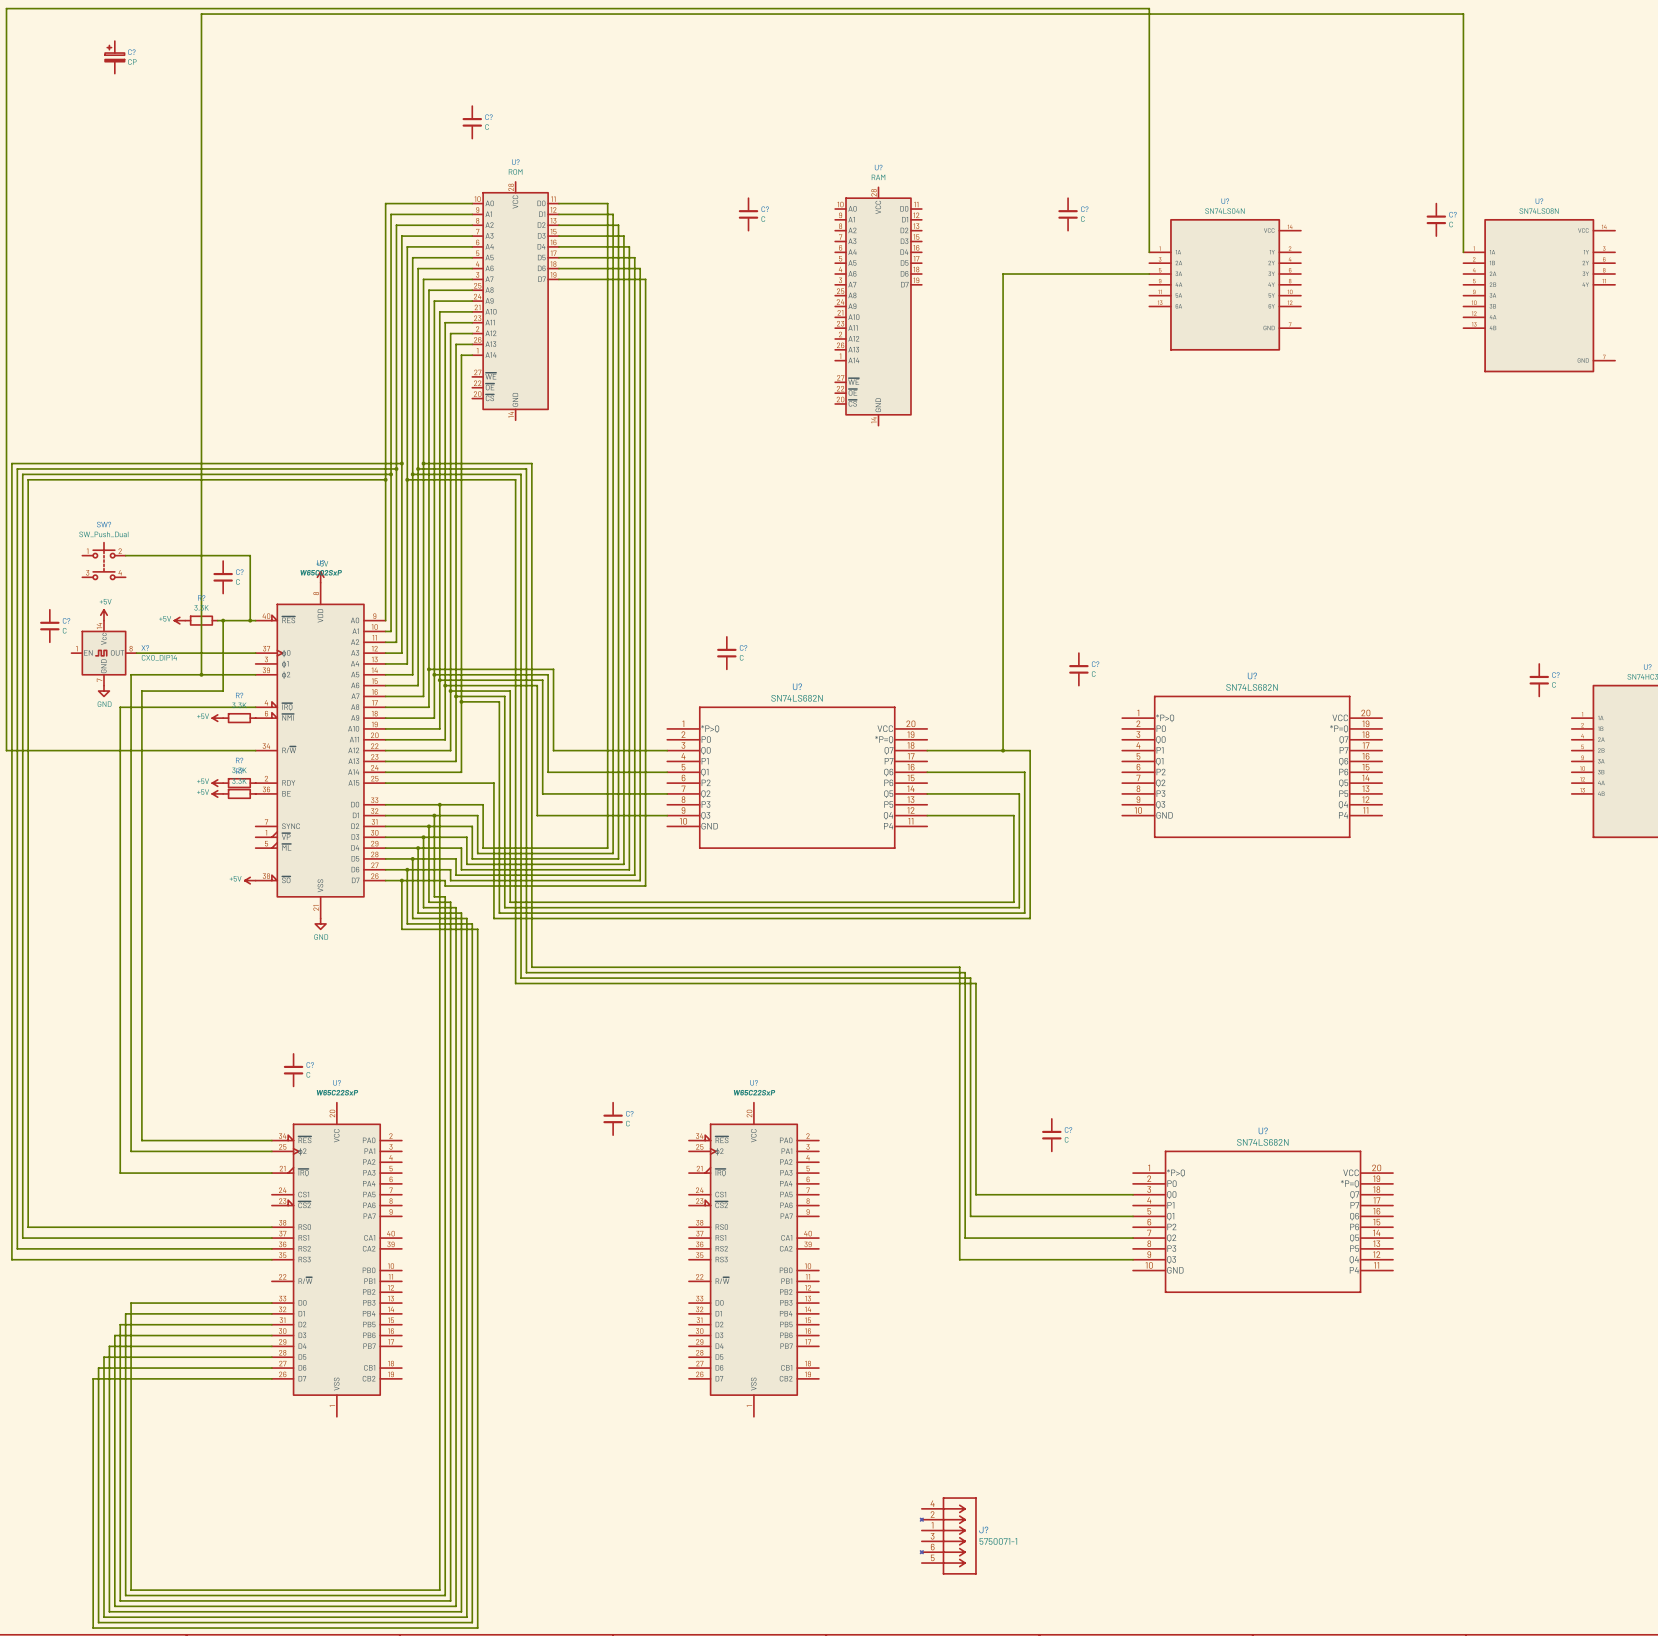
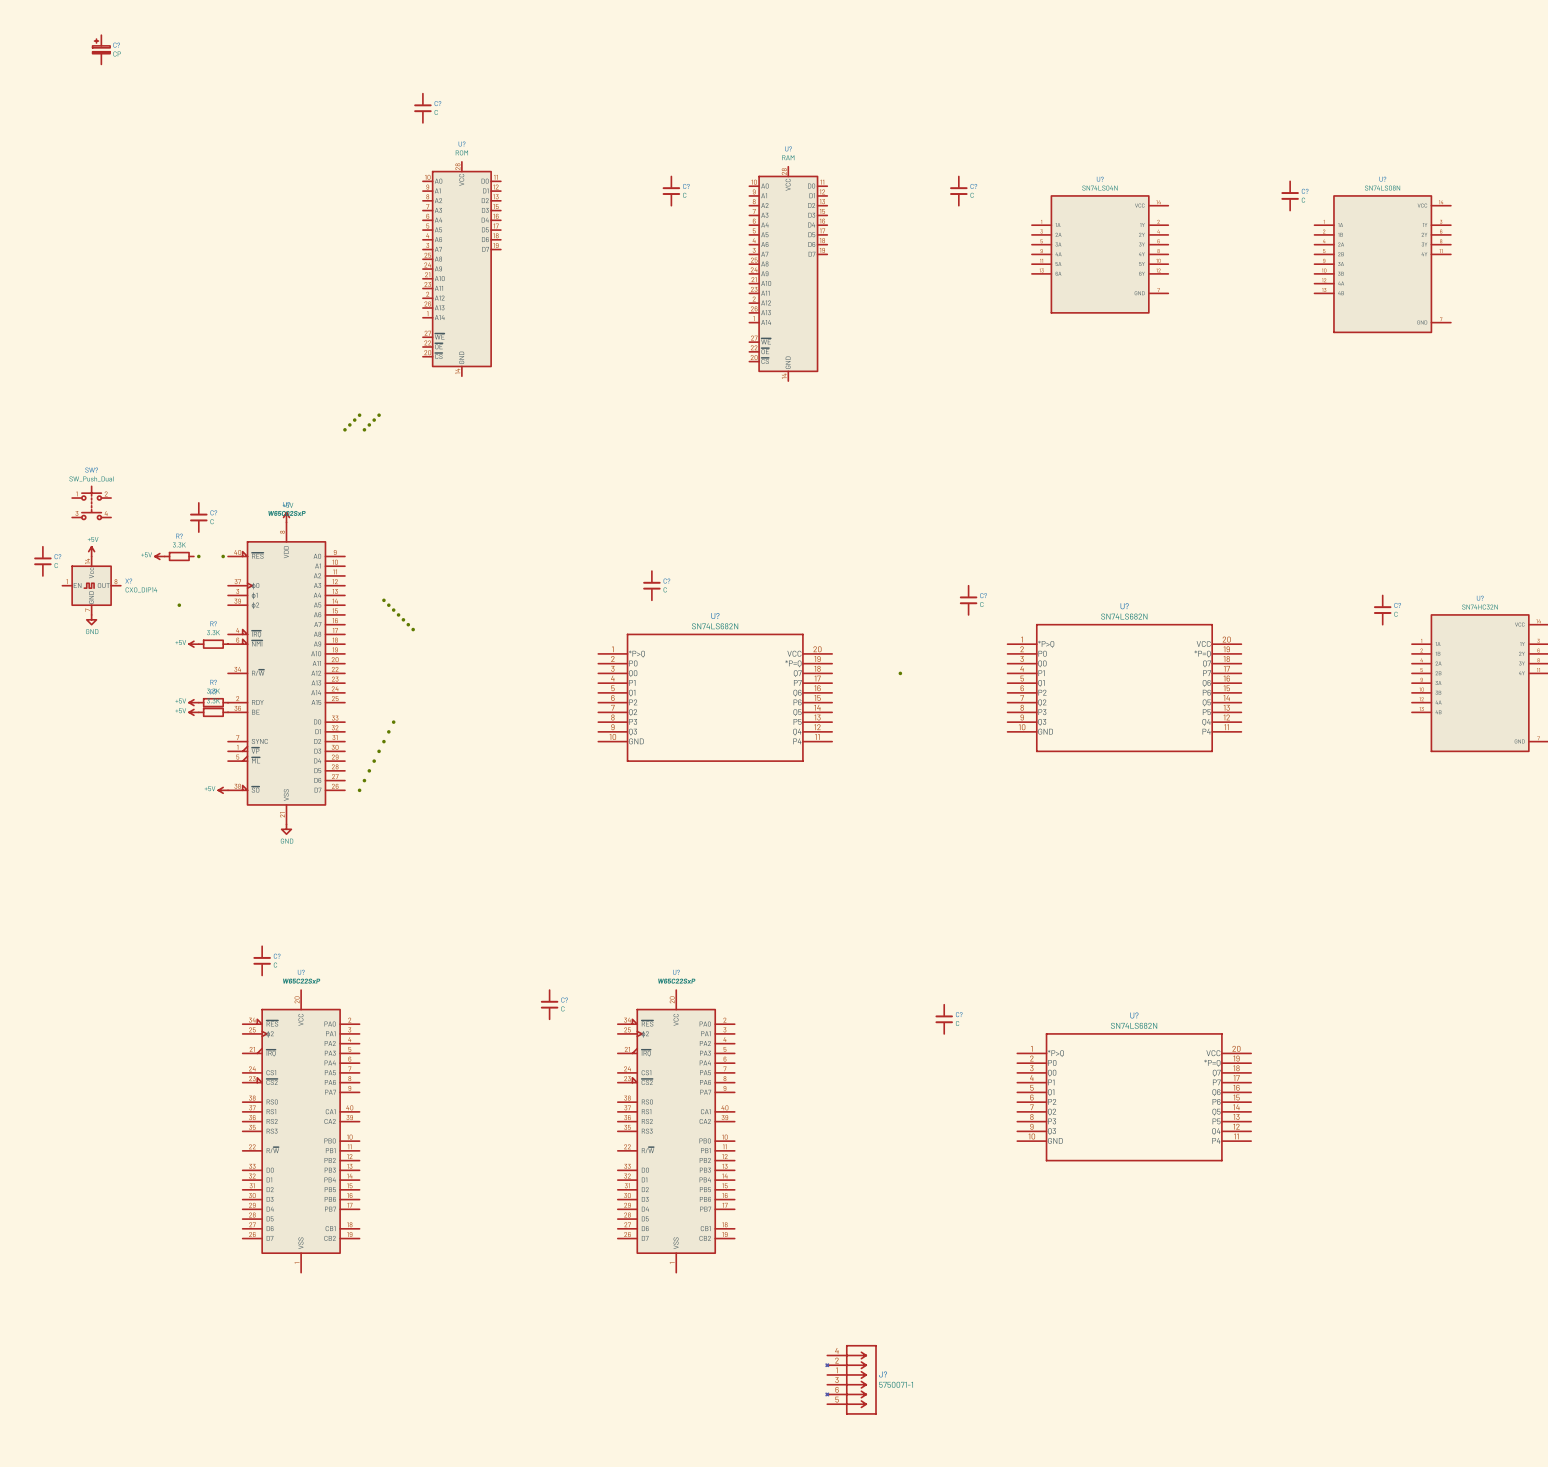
wire: (472, 203) (385, 203) (385, 620) -> none
wire: (558, 203) (607, 203) (607, 848) (483, 848) (483, 804) (385, 804) -> none
wire: (472, 214) (391, 214) (391, 631) (385, 631) -> none
wire: (558, 214) (613, 214) (613, 853) (477, 853) (477, 815) (385, 815) -> none
wire: (472, 225) (396, 225) (396, 642) (385, 642) -> none
wire: (558, 225) (618, 225) (618, 858) (472, 858) (472, 826) (385, 826) -> none
wire: (472, 236) (401, 236) (401, 653) (385, 653) -> none
wire: (558, 236) (623, 236) (623, 864) (466, 864) (466, 837) (385, 837) -> none
wire: (472, 246) (407, 246) (407, 663) (385, 663) -> none
wire: (558, 246) (629, 246) (629, 869) (461, 869) (461, 848) (385, 848) -> none
wire: (1149, 252) (1149, 8) (6, 8) (6, 750) (255, 750) -> none
wire: (1463, 252) (1463, 14) (201, 14) (201, 674) -> none
wire: (472, 257) (412, 257) (412, 674) (385, 674) -> none
wire: (558, 257) (634, 257) (634, 875) (456, 875) (456, 858) (385, 858) -> none
wire: (472, 268) (418, 268) (418, 685) (385, 685) -> none
wire: (558, 268) (640, 268) (640, 880) (450, 880) (450, 869) (385, 869) -> none
wire: (1149, 274) (1003, 274) (1003, 750) -> none
wire: (472, 279) (423, 279) (423, 696) (385, 696) -> none
wire: (558, 279) (645, 279) (645, 886) (445, 886) (445, 880) (385, 880) -> none
wire: (472, 290) (428, 290) (428, 707) (385, 707) -> none
wire: (472, 301) (434, 301) (434, 718) (385, 718) -> none
wire: (472, 311) (439, 311) (439, 728) (385, 728) -> none
wire: (472, 322) (445, 322) (445, 739) (385, 739) -> none
wire: (472, 333) (450, 333) (450, 750) (385, 750) -> none
wire: (472, 344) (456, 344) (456, 761) (385, 761) -> none
wire: (472, 355) (461, 355) (461, 772) (385, 772) -> none
wire: (401, 463) (11, 463) (11, 1259) (271, 1259) -> none
wire: (423, 463) (531, 463) (531, 967) (959, 967) (959, 1259) (1133, 1259) -> none
wire: (396, 468) (17, 468) (17, 1248) (271, 1248) -> none
wire: (418, 468) (526, 468) (526, 972) (965, 972) (965, 1238) (1133, 1238) -> none
wire: (391, 474) (22, 474) (22, 1238) (271, 1238) -> none
wire: (412, 474) (521, 474) (521, 978) (970, 978) (970, 1216) (1133, 1216) -> none
wire: (385, 479) (28, 479) (28, 1227) (271, 1227) -> none
wire: (407, 479) (515, 479) (515, 983) (975, 983) (975, 1194) (1133, 1194) -> none
wire: (125, 555) (250, 555) (250, 620) -> none
wire: (217, 620) (255, 620) -> none
wire: (223, 620) (223, 691) (141, 691) (141, 1140) (271, 1140) -> none
wire: (136, 653) (255, 653) -> none
wire: (428, 669) (553, 669) (553, 750) (667, 750) -> none
wire: (255, 674) (131, 674) (131, 1151) (271, 1151) -> none
wire: (434, 674) (548, 674) (548, 772) (667, 772) -> none
wire: (439, 680) (542, 680) (542, 793) (667, 793) -> none
wire: (445, 685) (537, 685) (537, 815) (667, 815) -> none
wire: (450, 691) (510, 691) (510, 902) (1013, 902) (1013, 815) (927, 815) -> none
wire: (456, 696) (504, 696) (504, 907) (1019, 907) (1019, 793) (927, 793) -> none
wire: (461, 701) (499, 701) (499, 913) (1024, 913) (1024, 772) (927, 772) -> none
wire: (255, 707) (120, 707) (120, 1173) (271, 1173) -> none
wire: (927, 750) (1030, 750) (1030, 918) (493, 918) (493, 783) (385, 783) -> none
wire: (439, 804) (439, 1590) (131, 1590) (131, 1303) (271, 1303) -> none
wire: (434, 815) (434, 896) (445, 896) (445, 1595) (125, 1595) (125, 1313) (271, 1313) -> none
wire: (428, 826) (428, 902) (450, 902) (450, 1600) (120, 1600) (120, 1324) (271, 1324) -> none
wire: (423, 837) (423, 907) (456, 907) (456, 1606) (114, 1606) (114, 1335) (271, 1335) -> none
wire: (418, 848) (418, 913) (461, 913) (461, 1611) (109, 1611) (109, 1346) (271, 1346) -> none
wire: (412, 858) (412, 918) (466, 918) (466, 1617) (103, 1617) (103, 1357) (271, 1357) -> none
wire: (407, 869) (407, 923) (472, 923) (472, 1622) (98, 1622) (98, 1368) (271, 1368) -> none
wire: (401, 880) (401, 929) (477, 929) (477, 1628) (93, 1628) (93, 1378) (271, 1378) -> none

